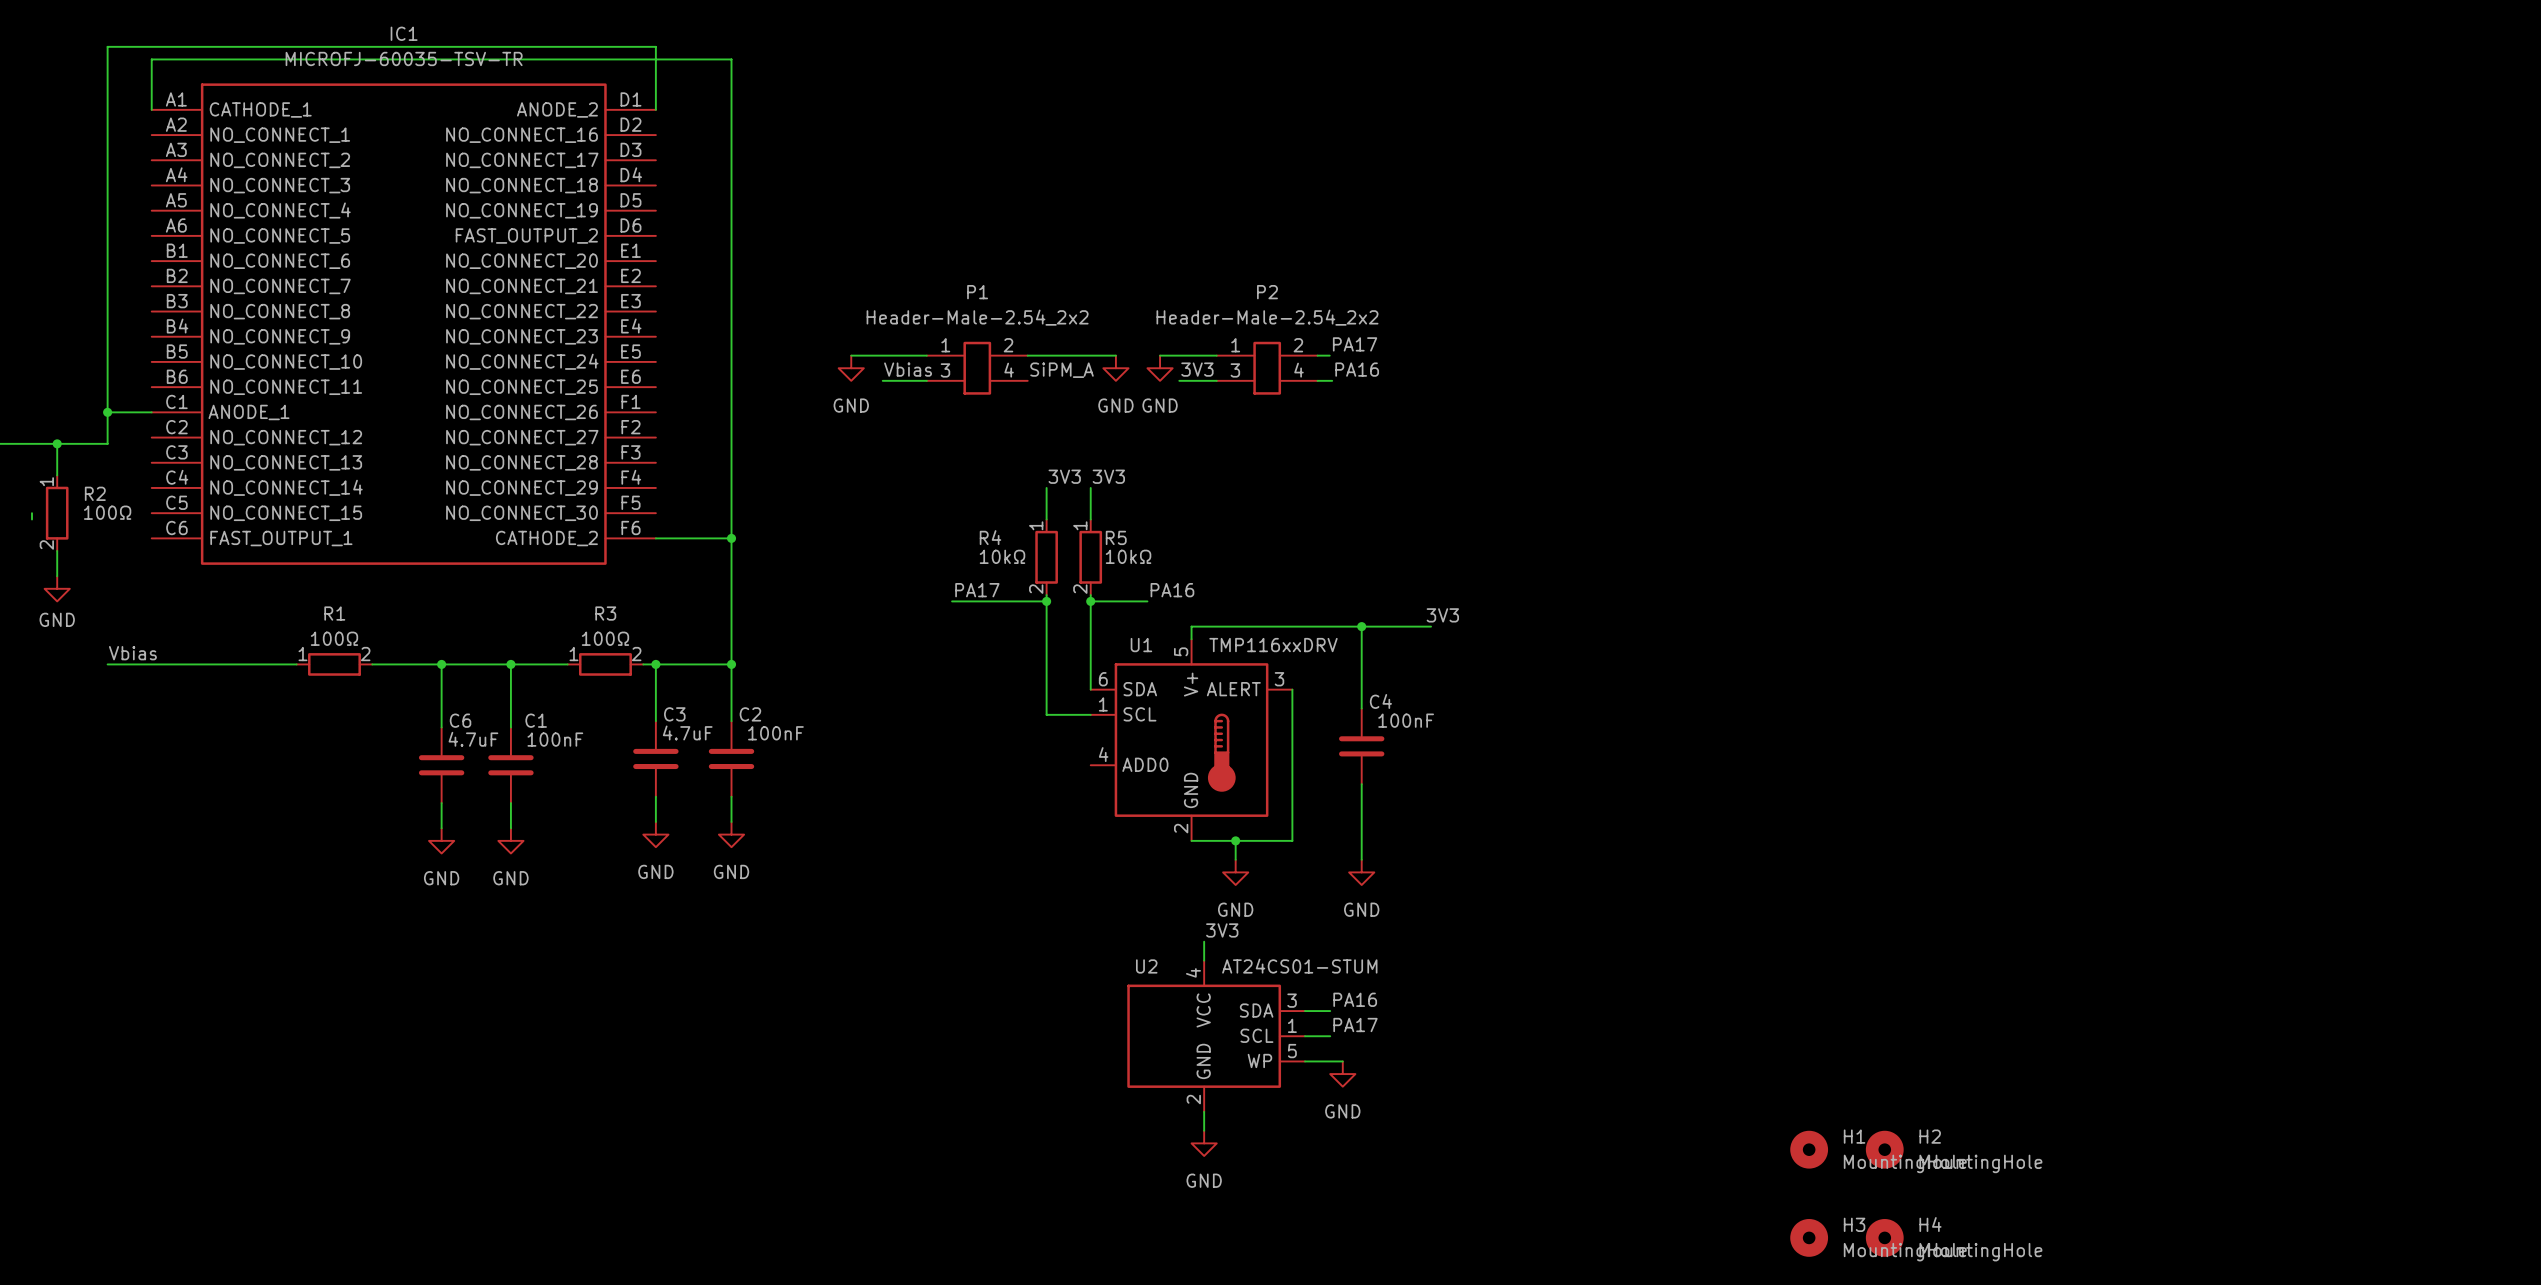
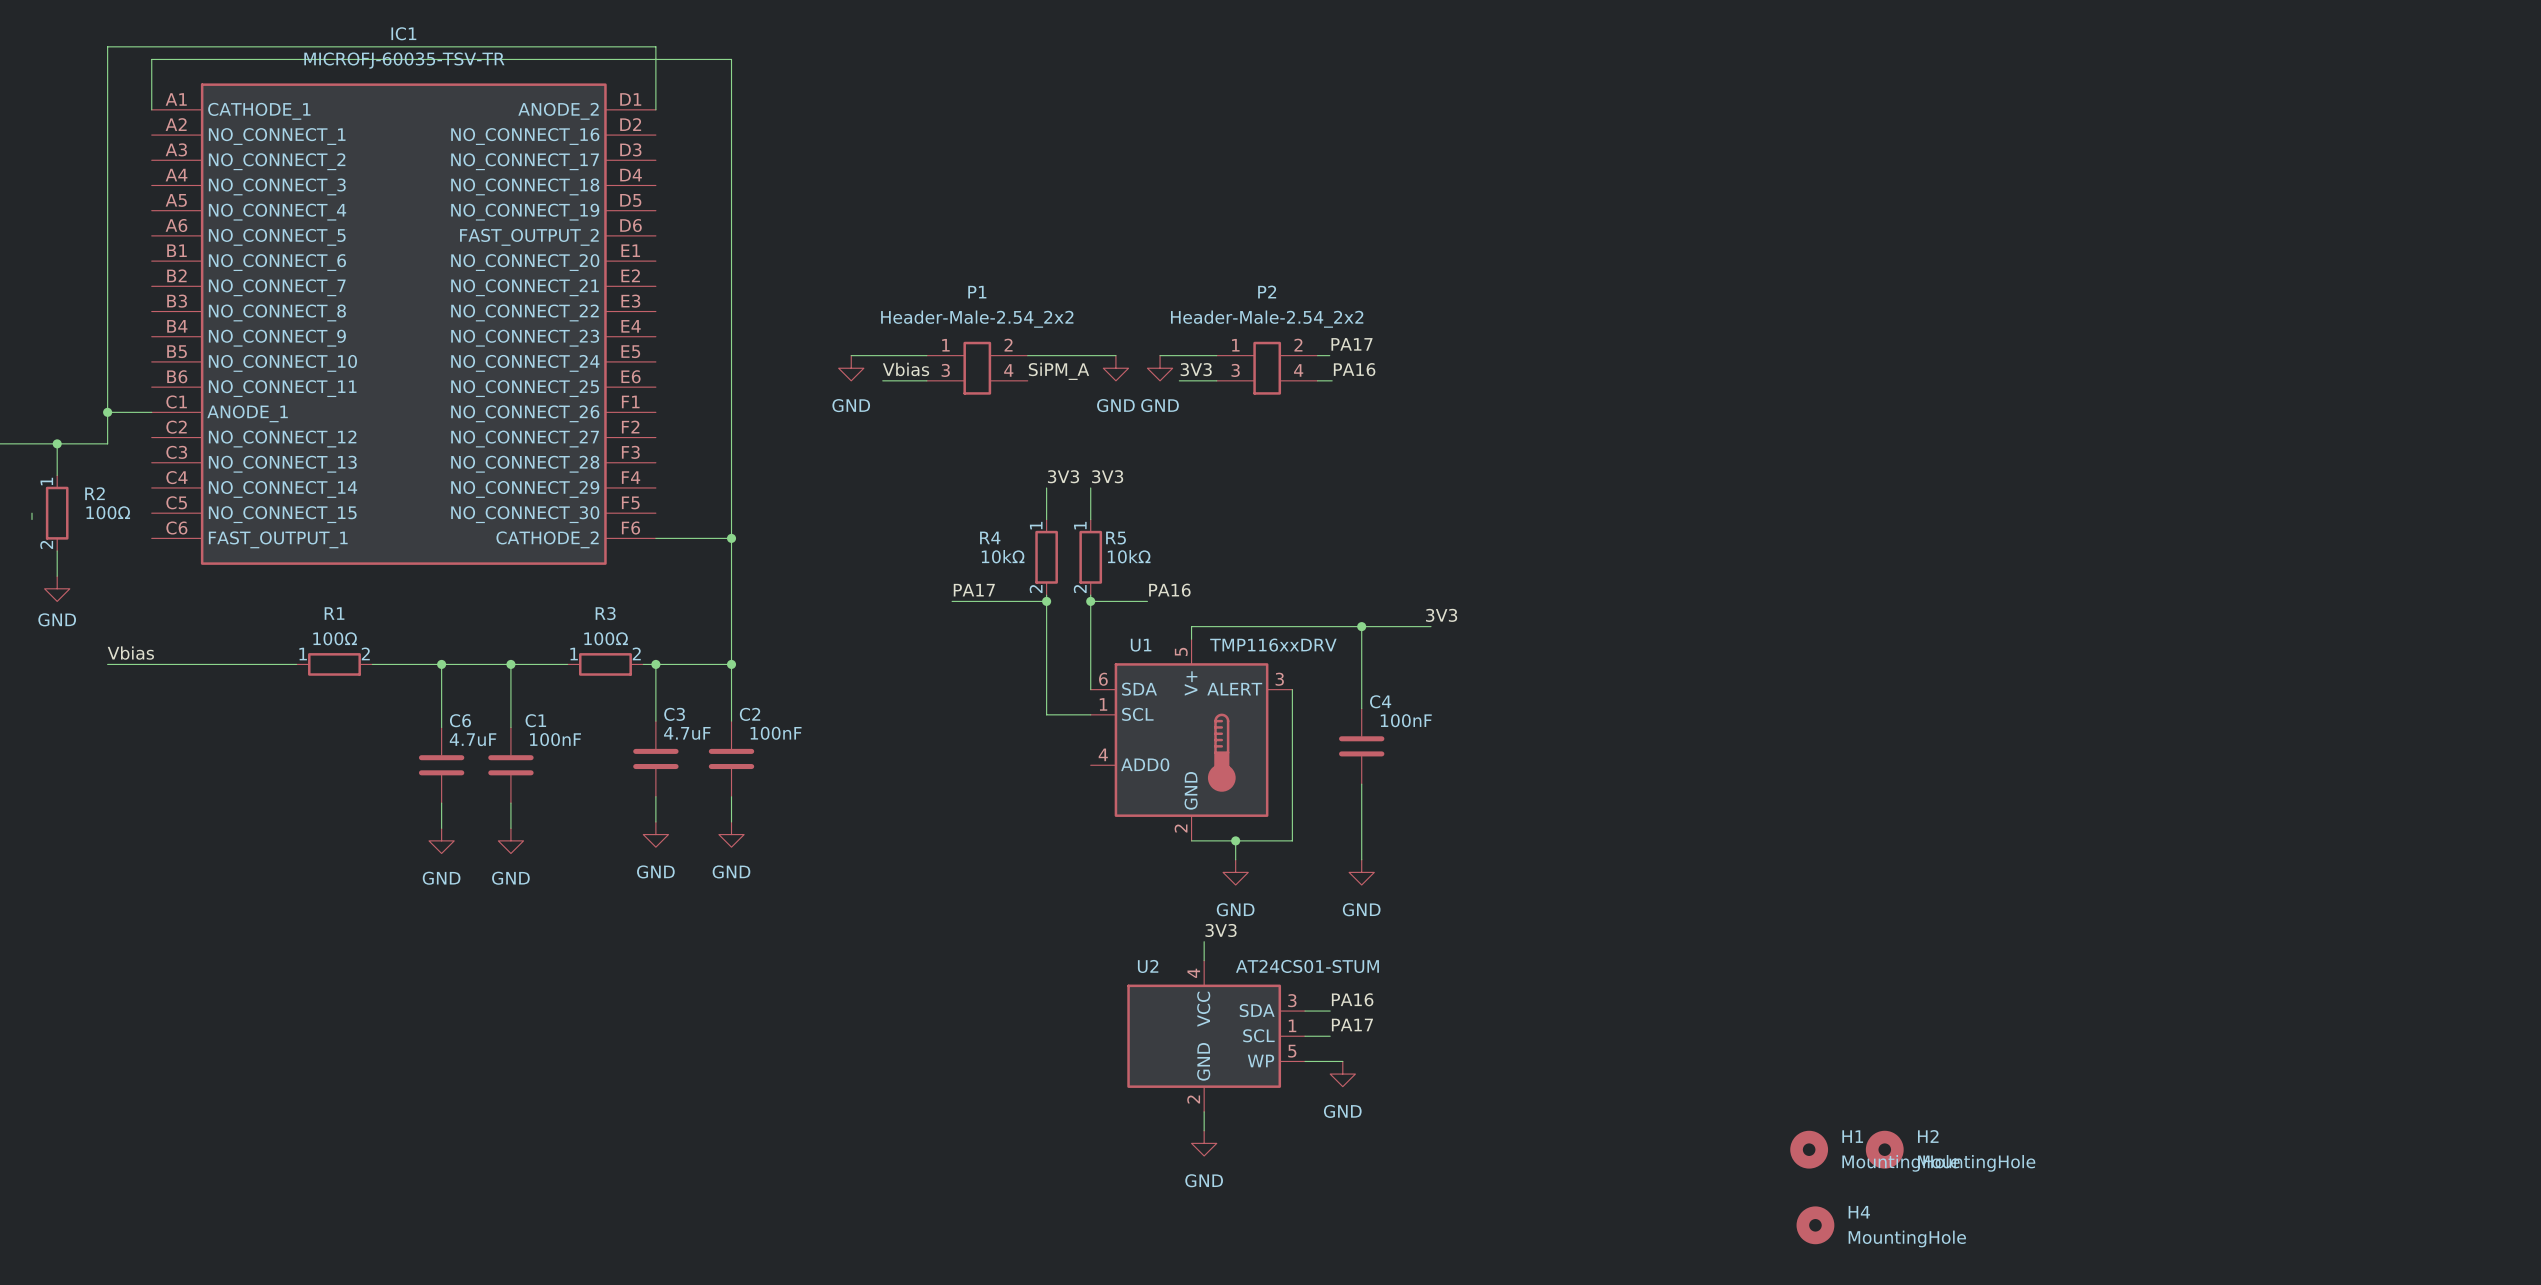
H3: MountingHole (1809, 1237) -> none
H4 position: (1884, 1237) -> (1815, 1225)

